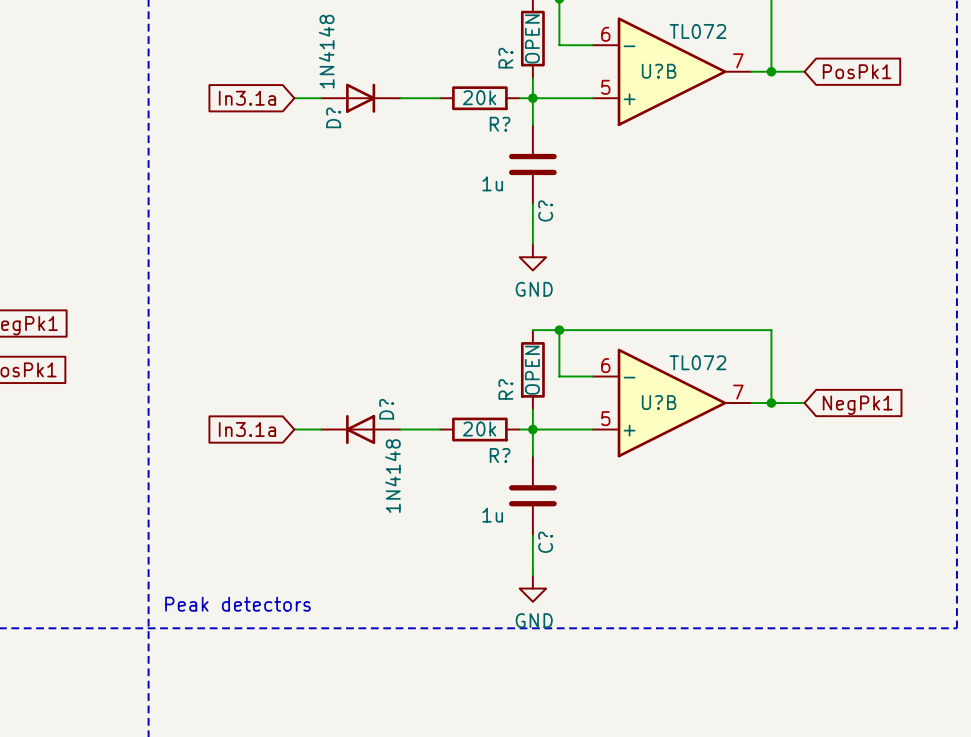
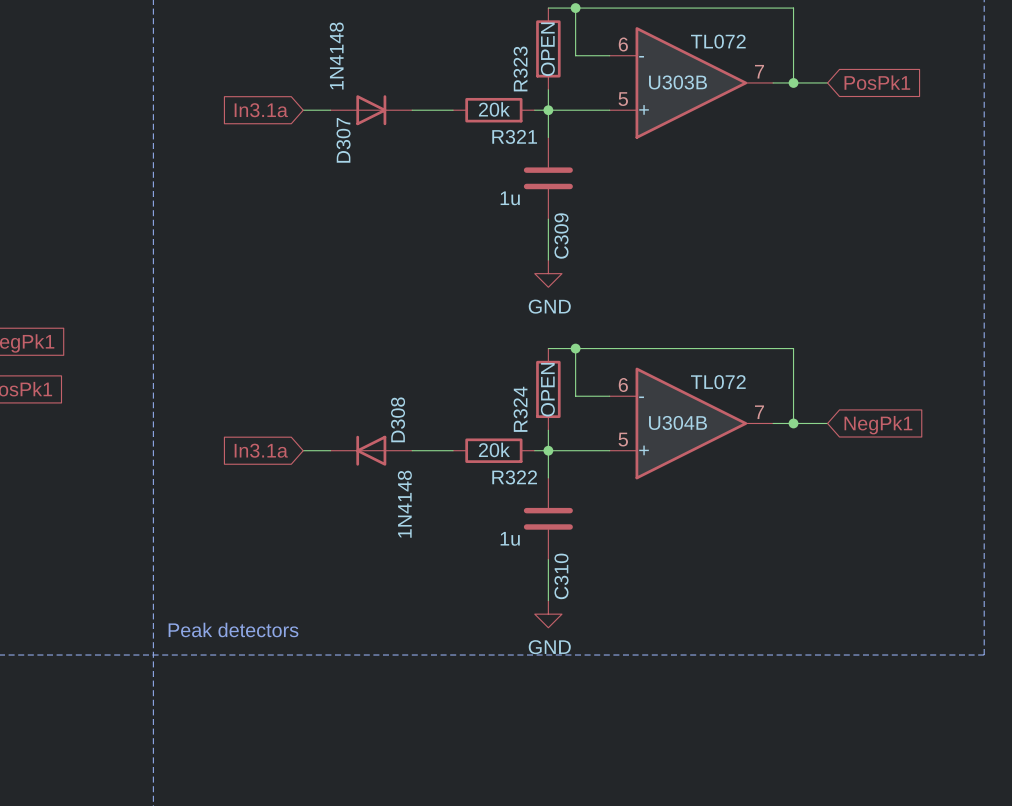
R? name: R? (505, 58) -> R323 (520, 68)
U?B name: U?B (659, 71) -> U303B (678, 82)
D? name: D? (333, 117) -> D307 (343, 140)
R? name: R? (500, 124) -> R321 (514, 136)
C? name: C? (545, 210) -> C309 (561, 235)
R? name: R? (505, 389) -> R324 (520, 409)
U?B name: U?B (659, 402) -> U304B (678, 422)
D? name: D? (386, 409) -> D308 (398, 419)
R? name: R? (500, 455) -> R322 (514, 477)
C? name: C? (545, 542) -> C310 (561, 576)

